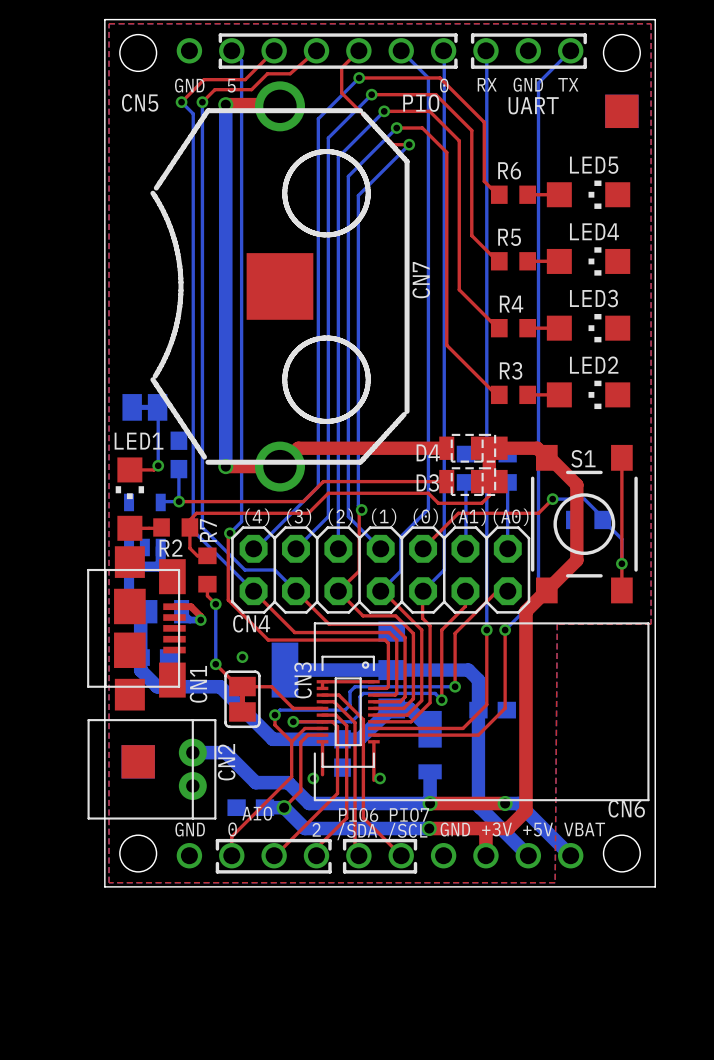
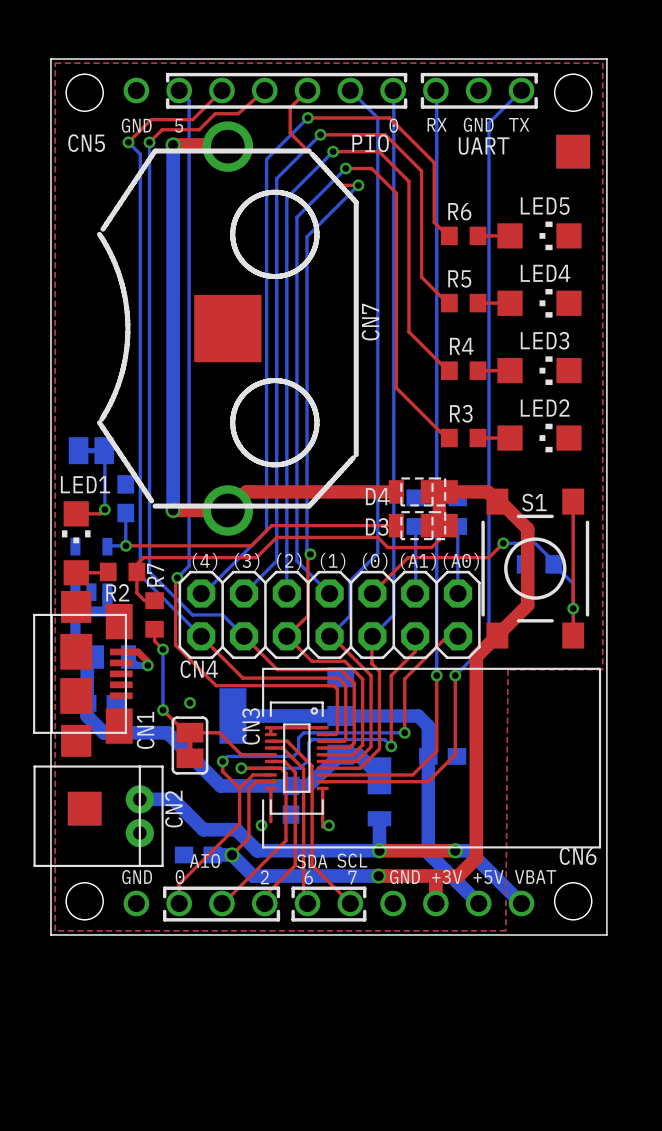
text: PIO6 (358, 814) -> SDA (312, 861)
text: PIO7 (409, 814) -> SCL (352, 860)
text: /SDA (357, 831) -> 6 (308, 877)
text: /SCL (407, 831) -> 7 (352, 877)

